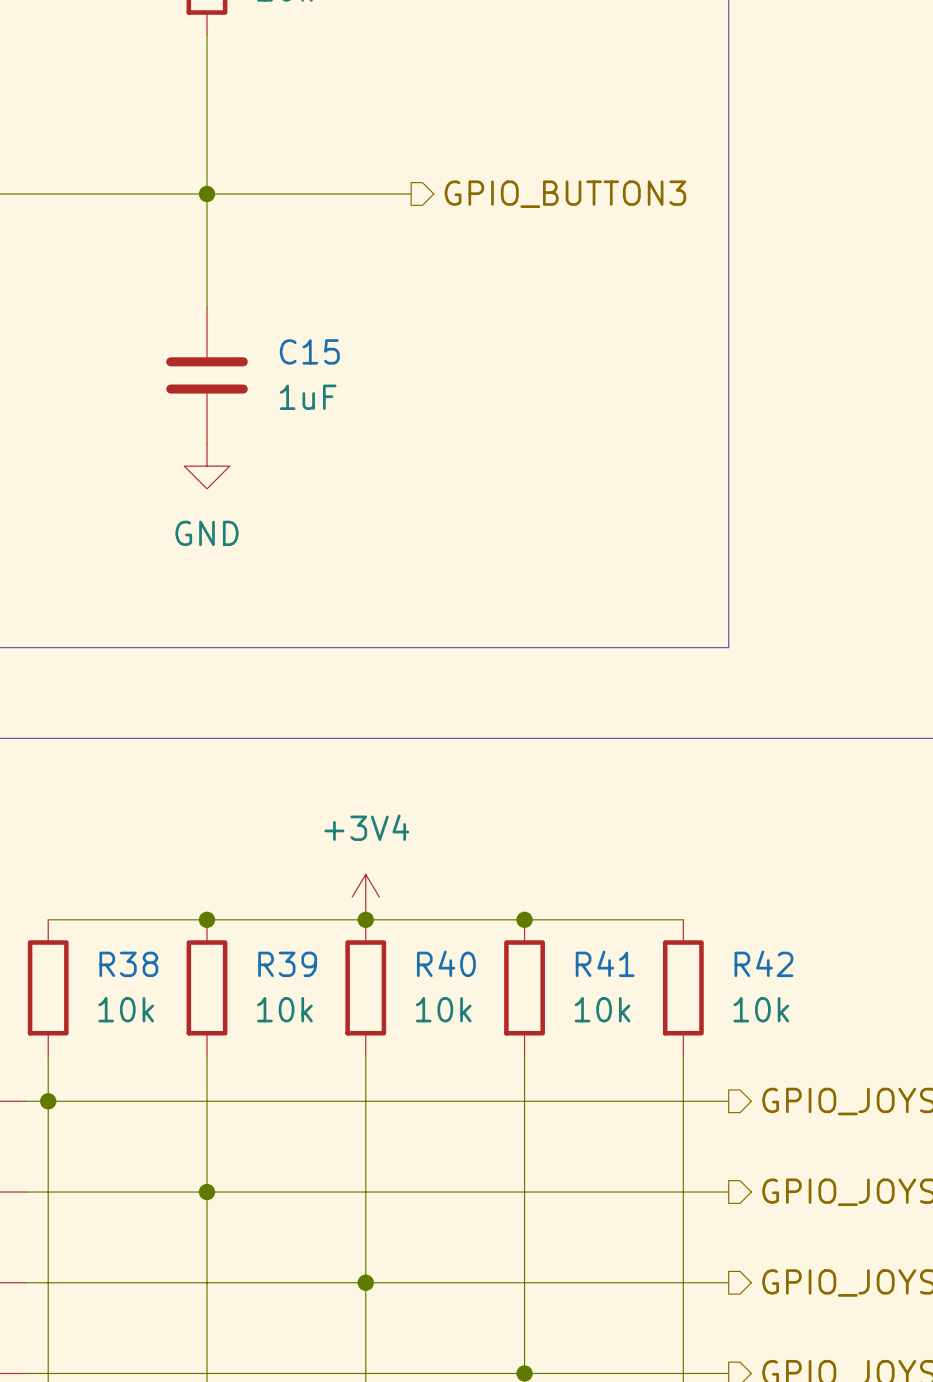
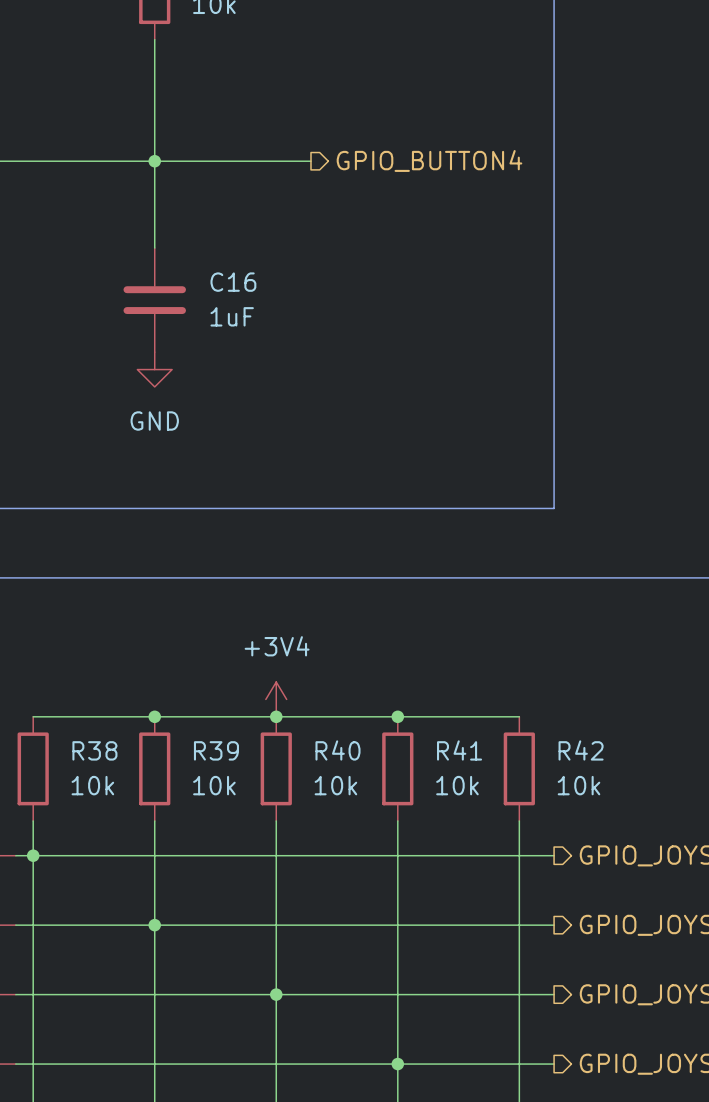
hierarchical label: GPIO_BUTTON3 (565, 194) -> GPIO_BUTTON4 (429, 160)
C15 name: C15 (309, 351) -> C16 (233, 282)

